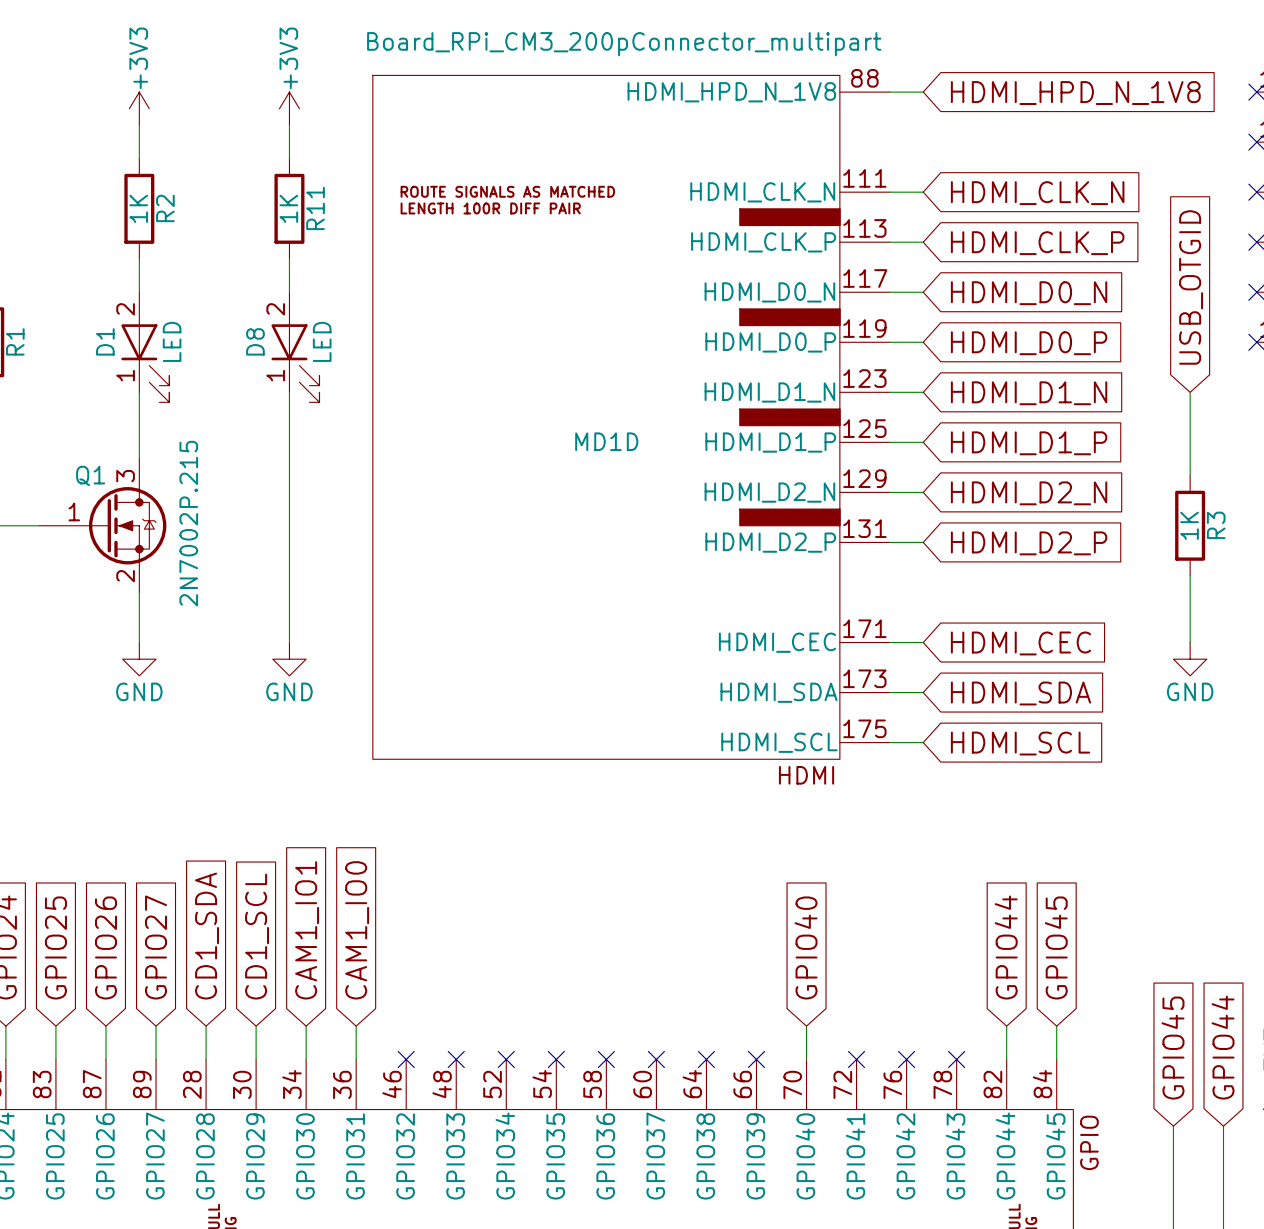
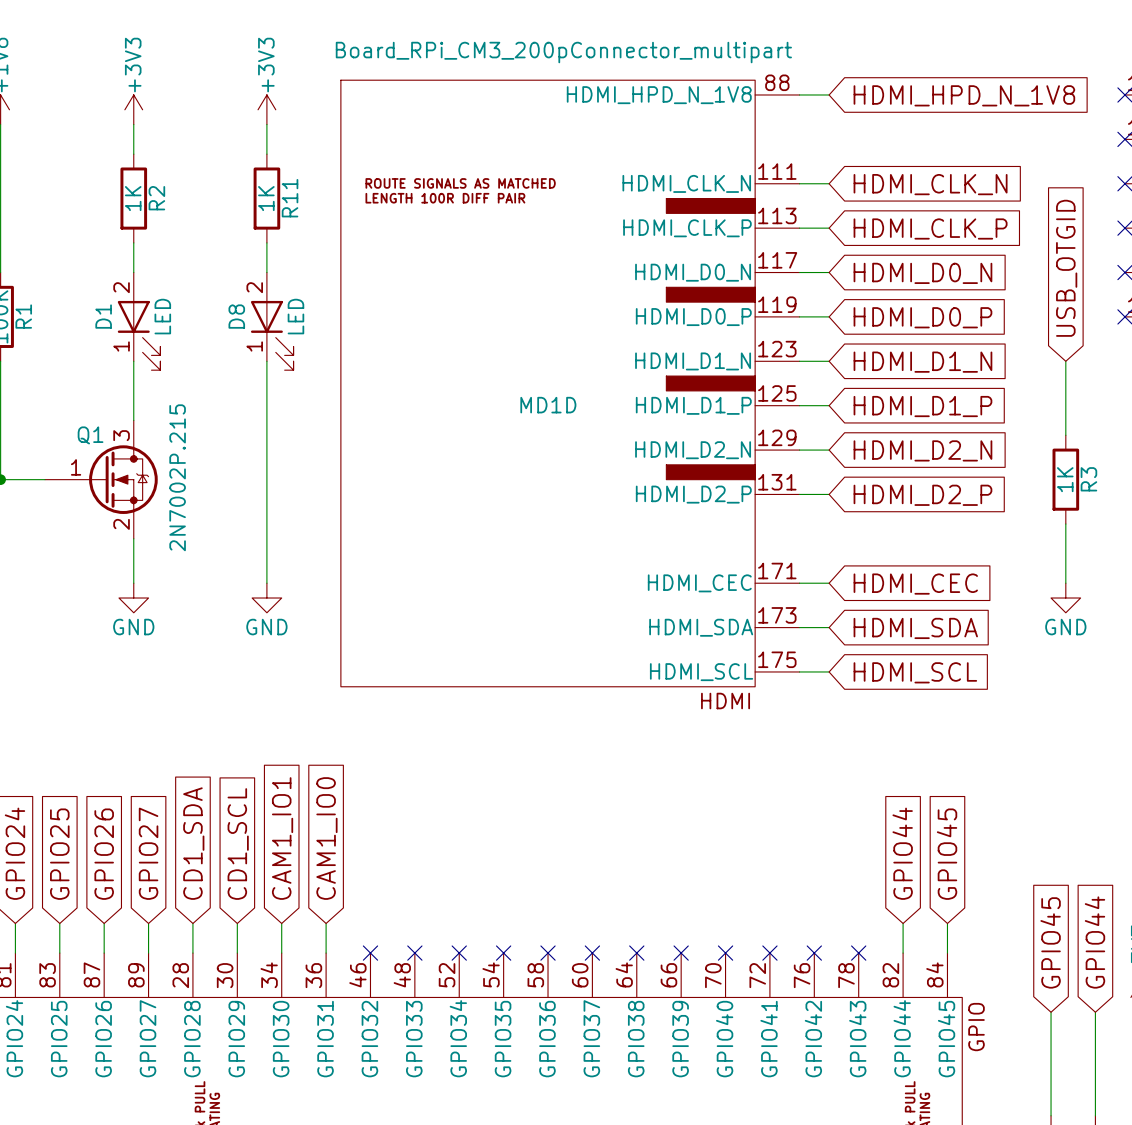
global label: GPIO40 (806, 947) -> none
wire: (806, 1026) (806, 1059) -> none
no-connect mark: none -> (725, 953)

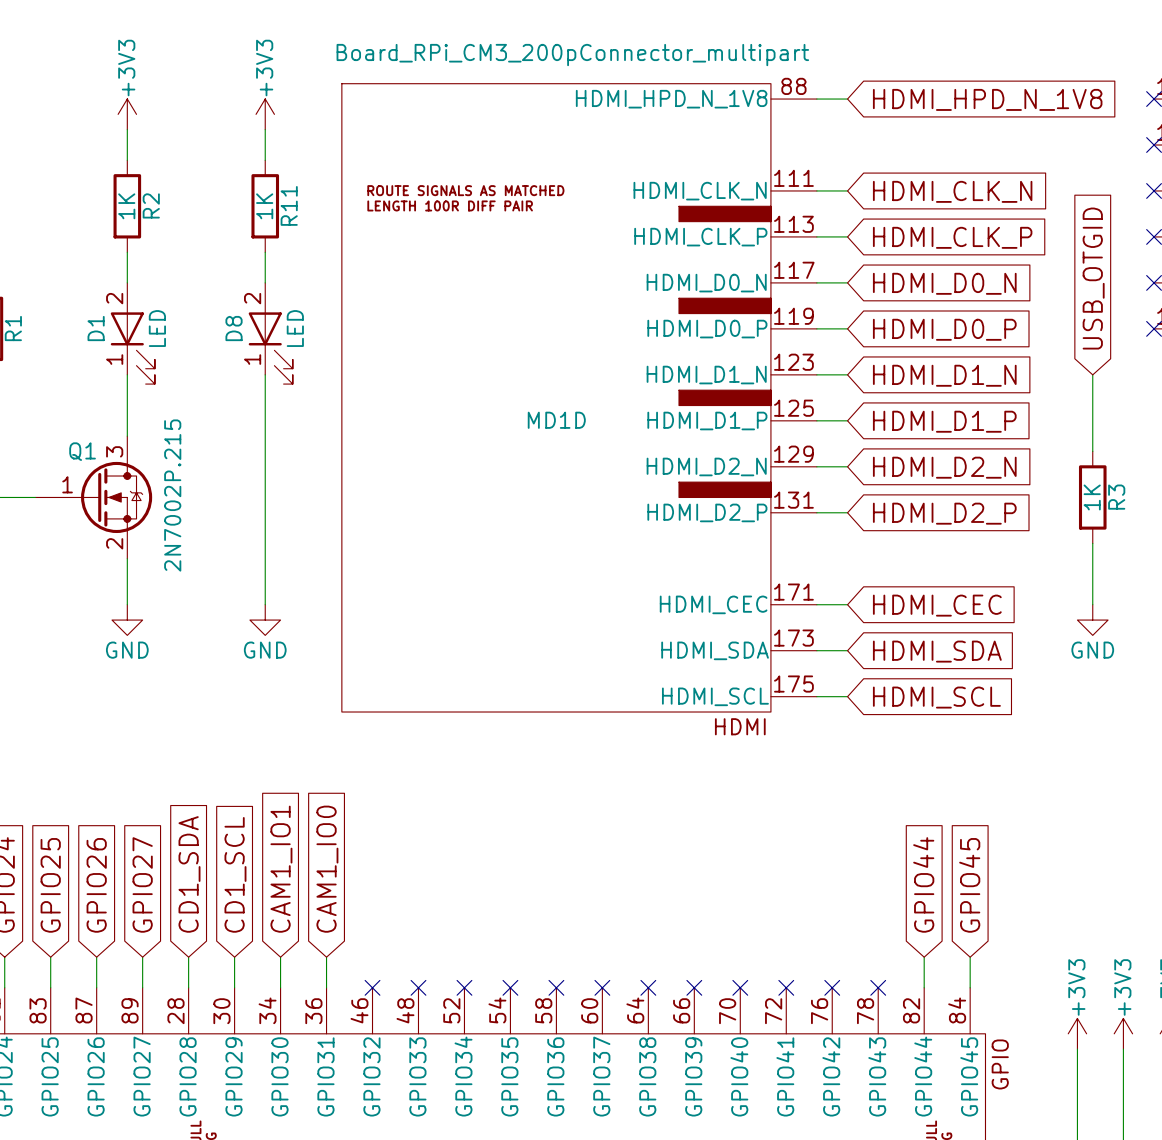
global label: GPIO45 (1050, 942) -> none
global label: GPIO44 (1094, 942) -> none
power symbol: none -> +3V3 (1077, 1033)
power symbol: none -> +3V3 (1123, 1033)

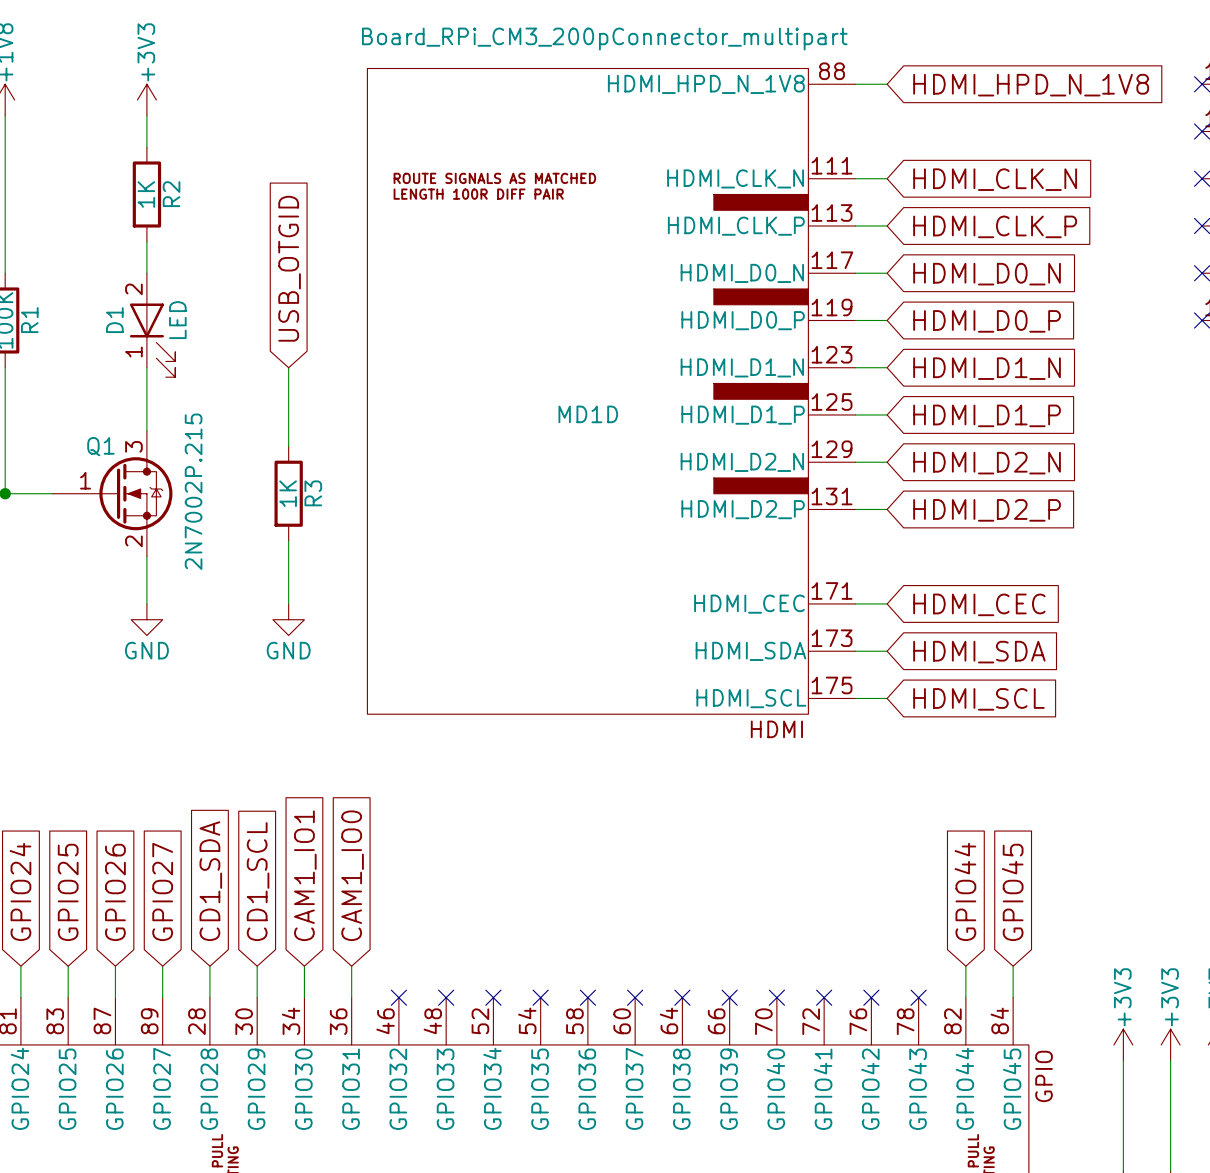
power symbol: +3V3 (265, 114) -> none
wire: (265, 129) (265, 160) -> none
R11: 1K (265, 206) -> none
wire: (265, 252) (265, 282) -> none
global label: none -> USB_OTGID (289, 268)
global label: USB_OTGID (1093, 278) -> none
D8: LED (270, 333) -> none
wire: (1092, 374) (1092, 451) -> none
wire: (265, 451) (265, 543) -> none
R3 position: (1092, 497) -> (288, 493)
wire: (1092, 543) (1092, 604) -> none
power symbol: GND (1092, 620) -> none

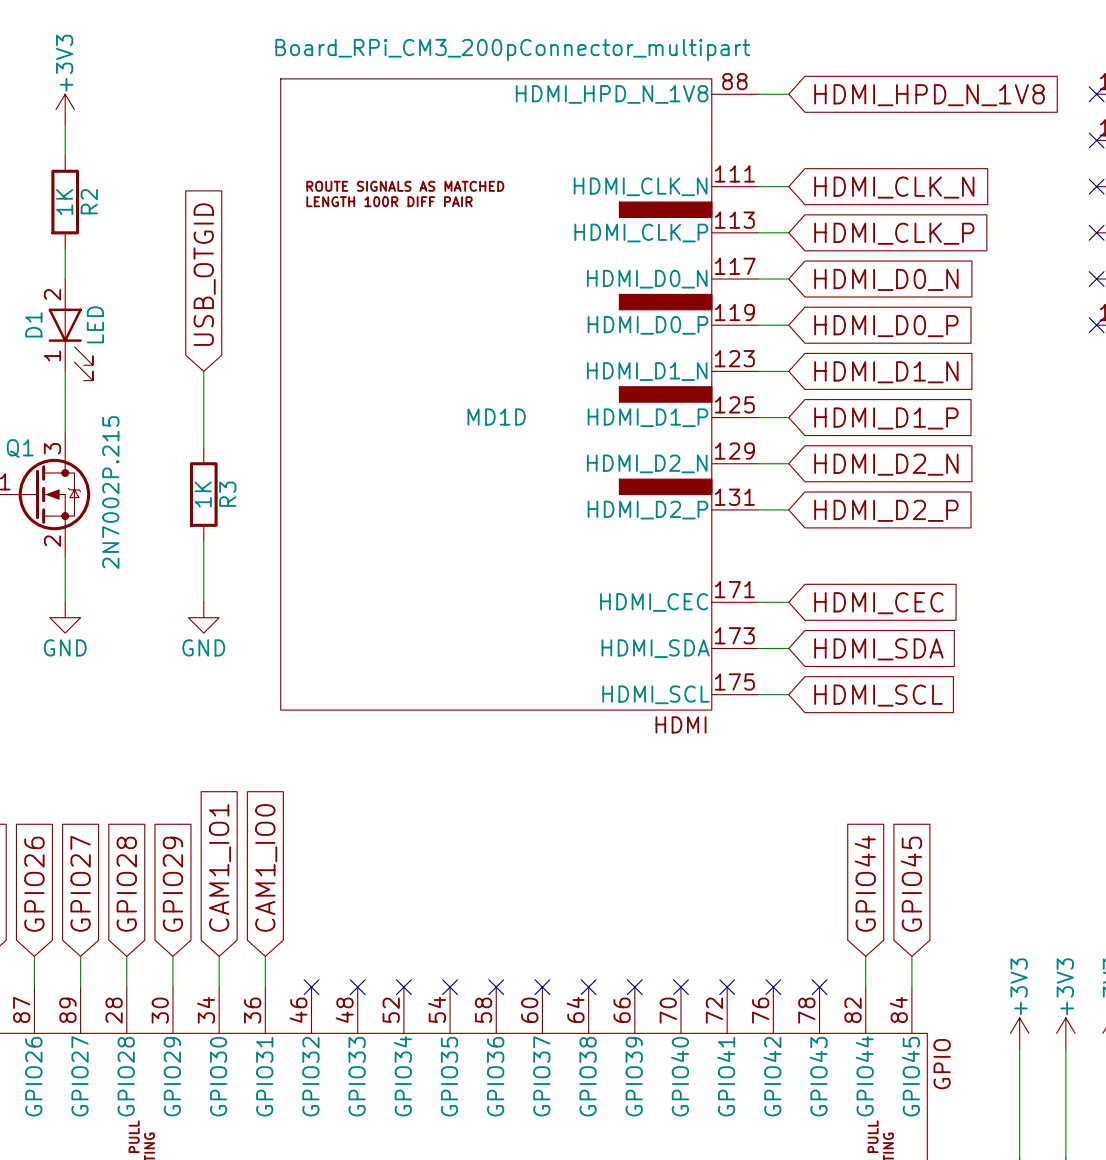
global label: CD1_SDA (210, 881) -> GPIO28 (126, 884)
global label: CD1_SCL (258, 881) -> GPIO29 (172, 884)

